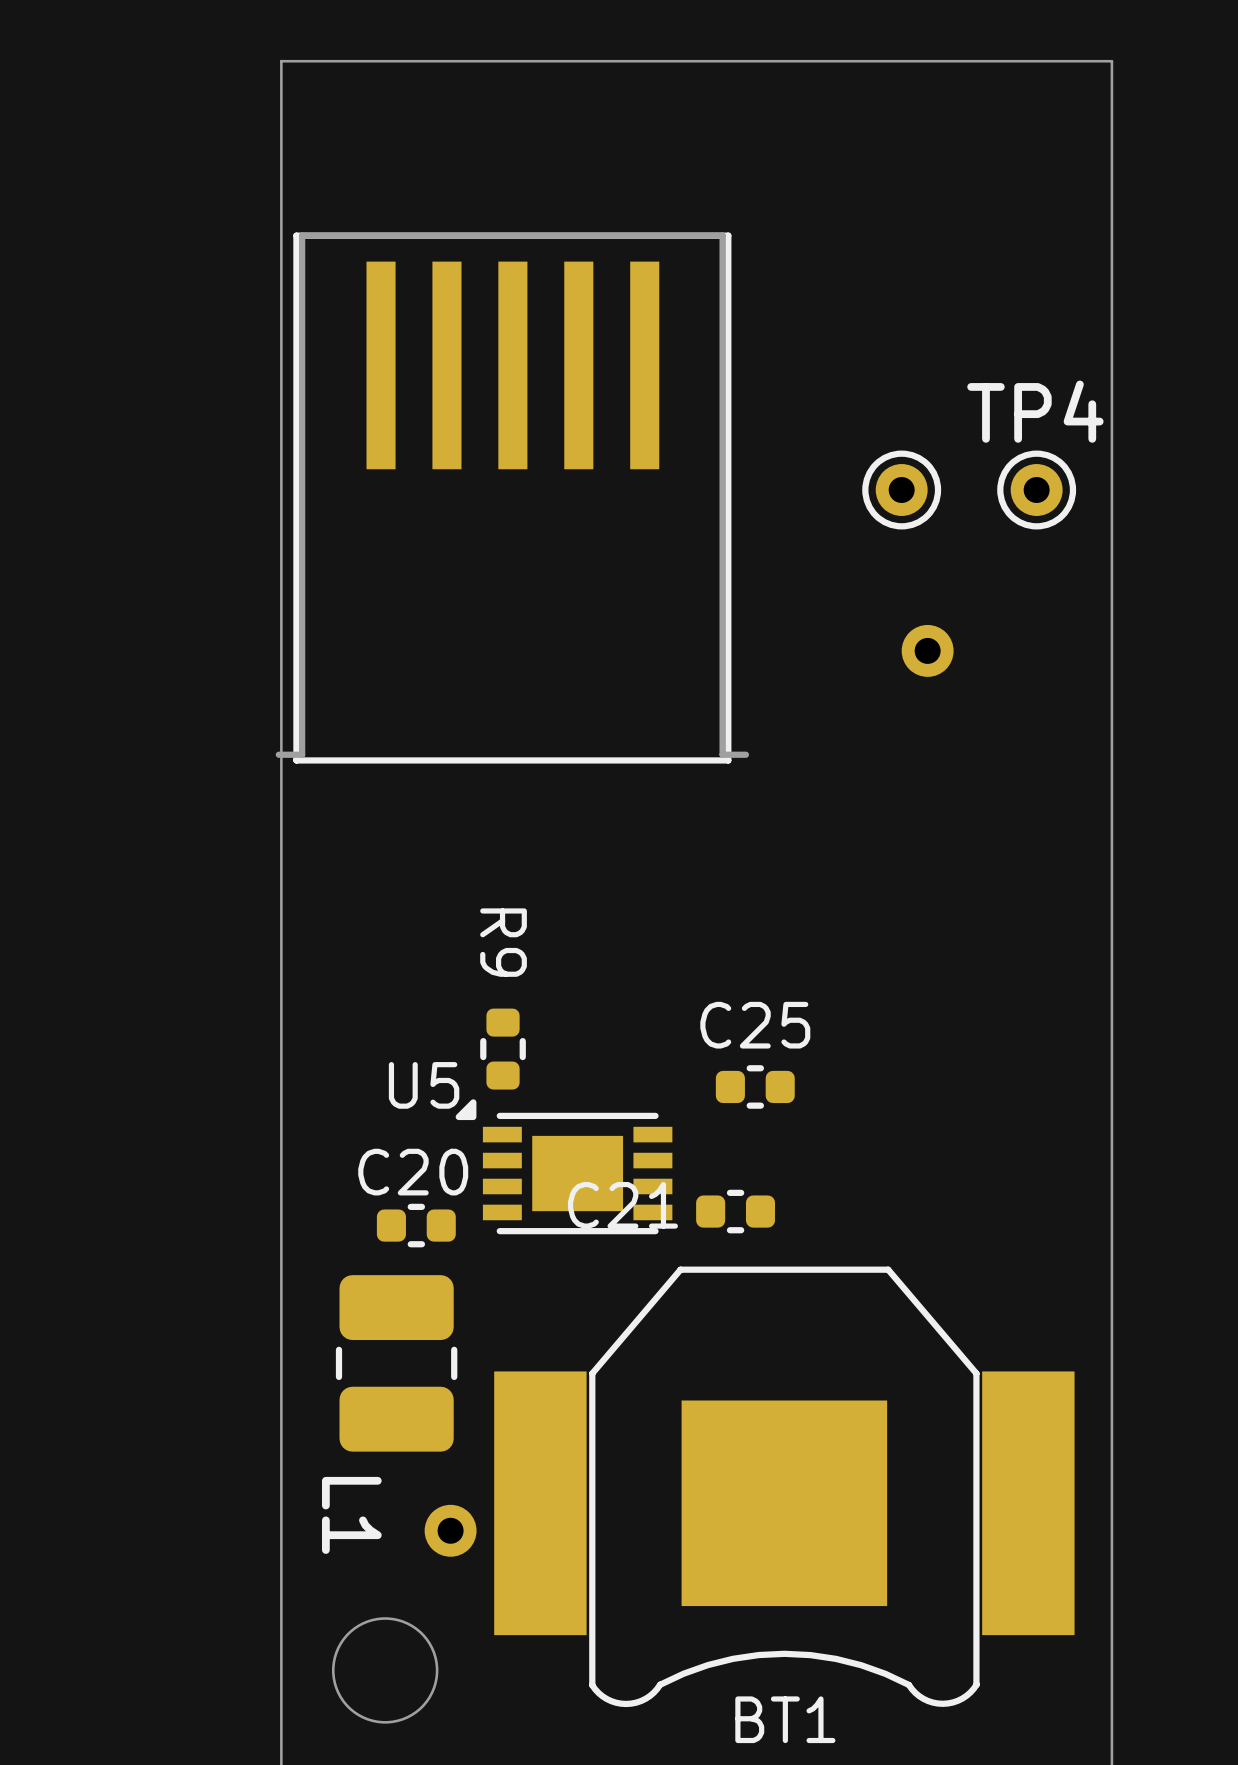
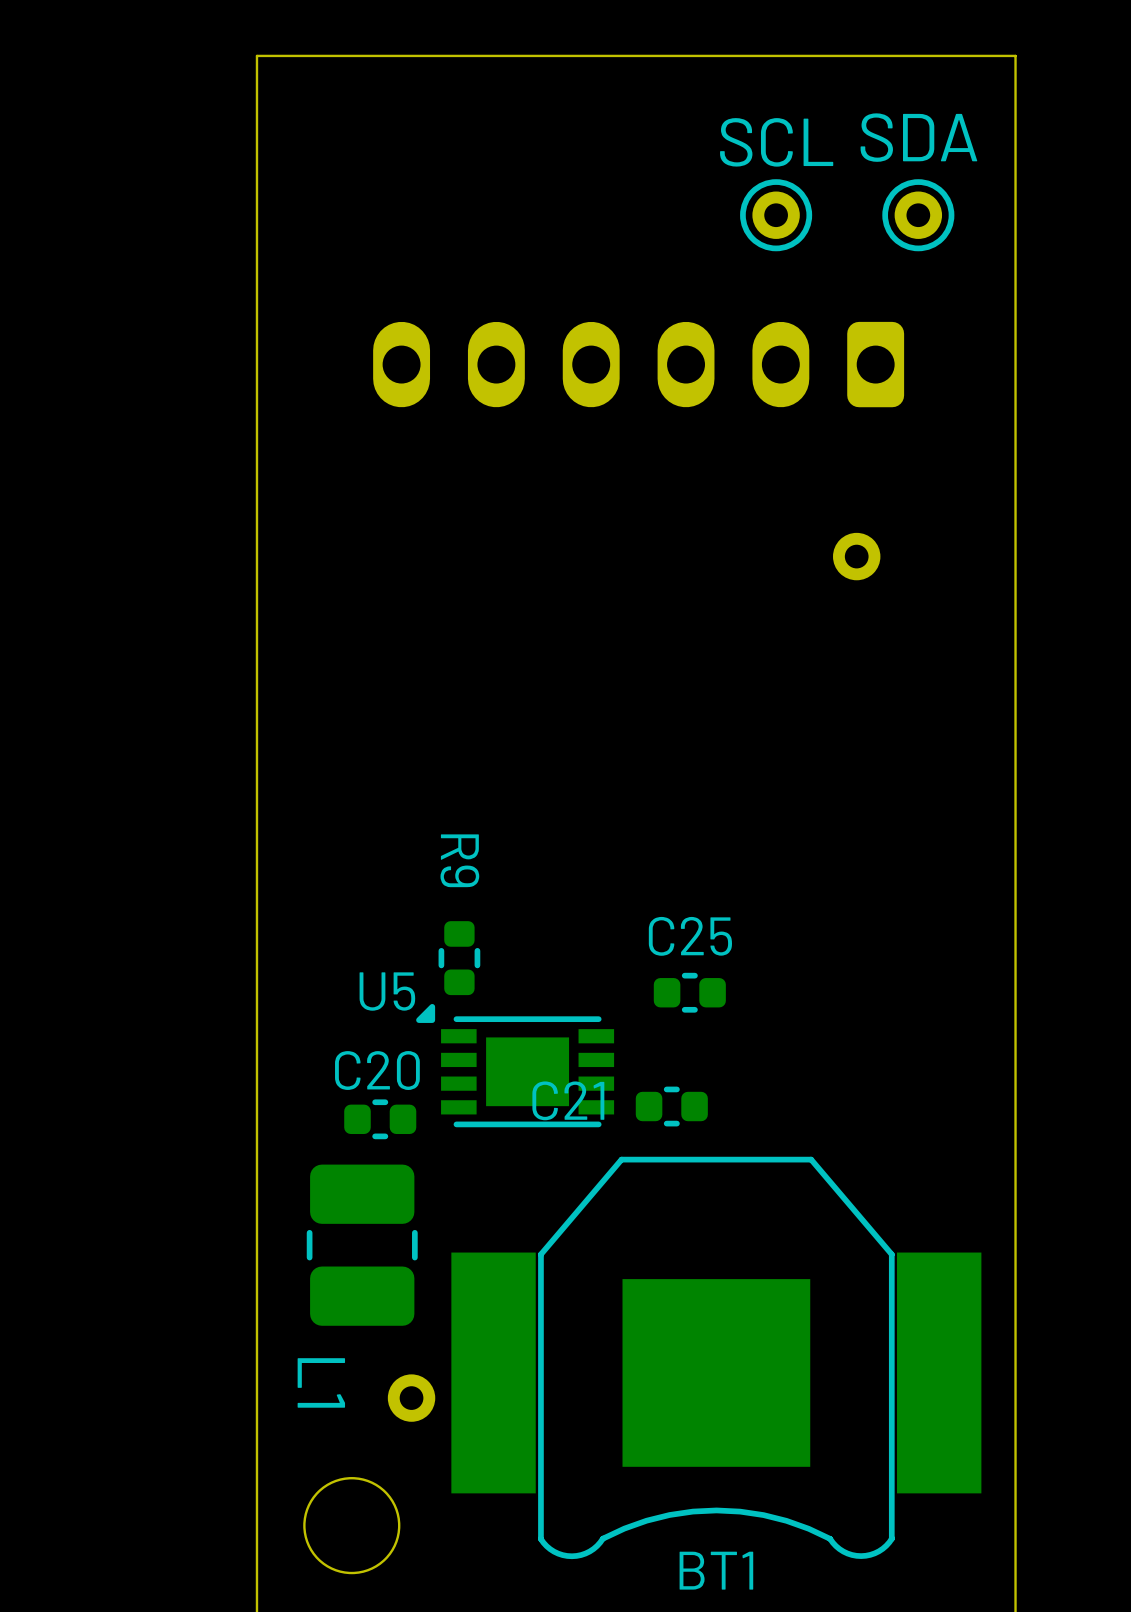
part: none -> SCL (776, 215)
part: none -> SDA (918, 215)
part: none -> (638, 364)
part: (901, 490) -> none
TP4: (1036, 490) -> none
part: (512, 498) -> none
part position: (927, 650) -> (856, 556)

